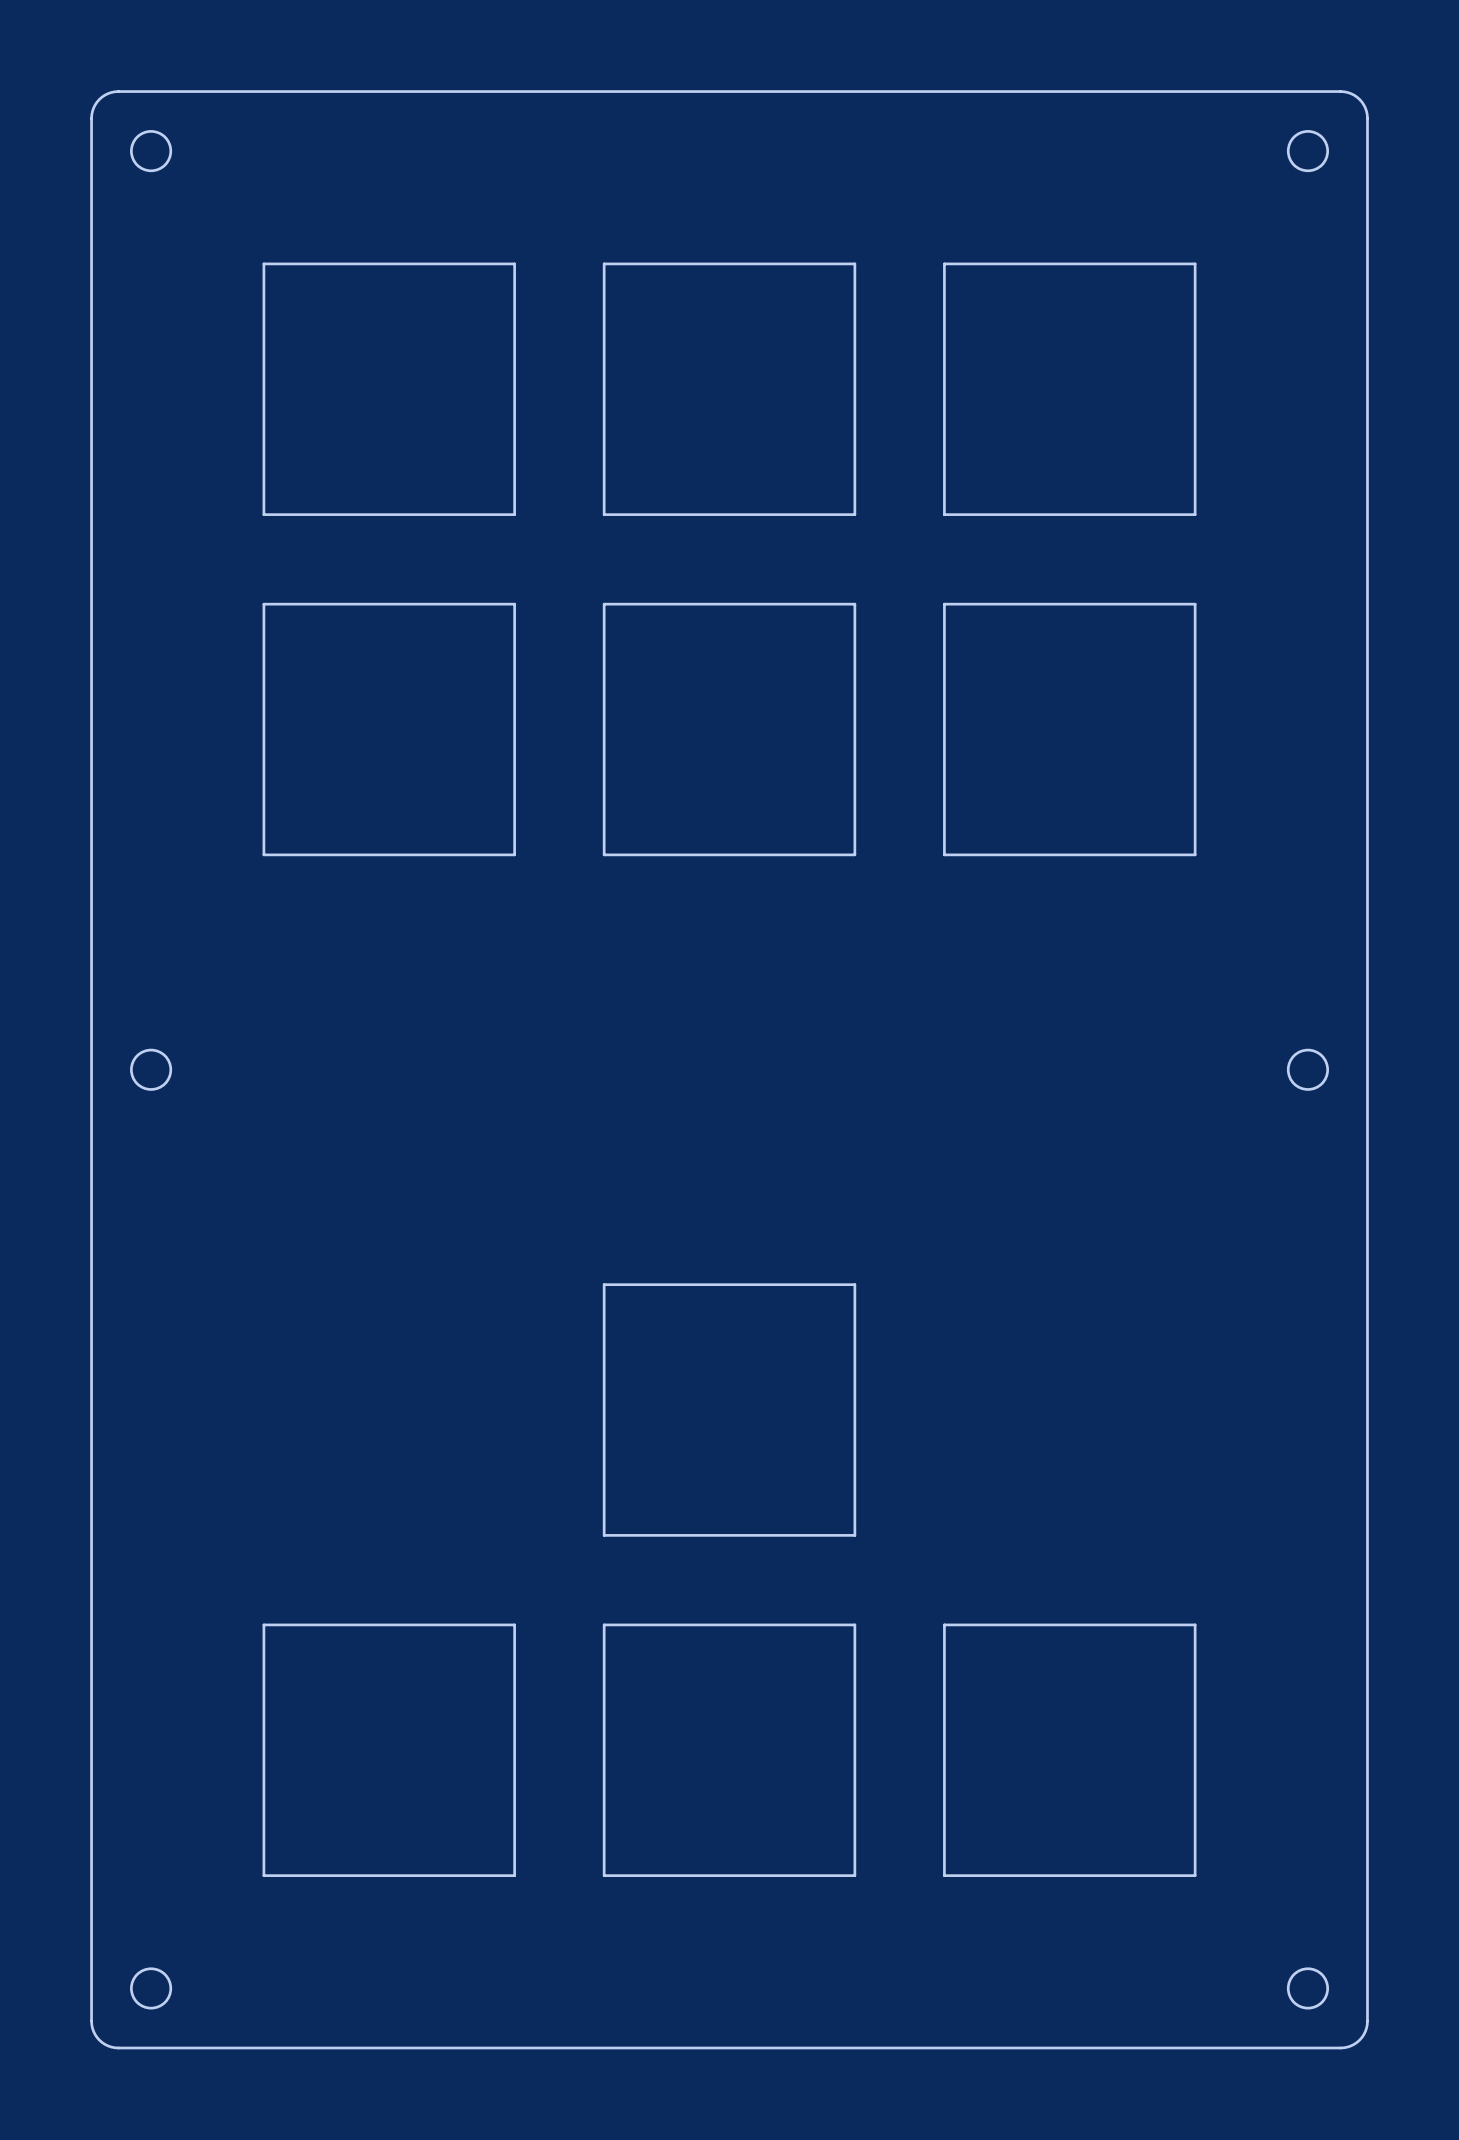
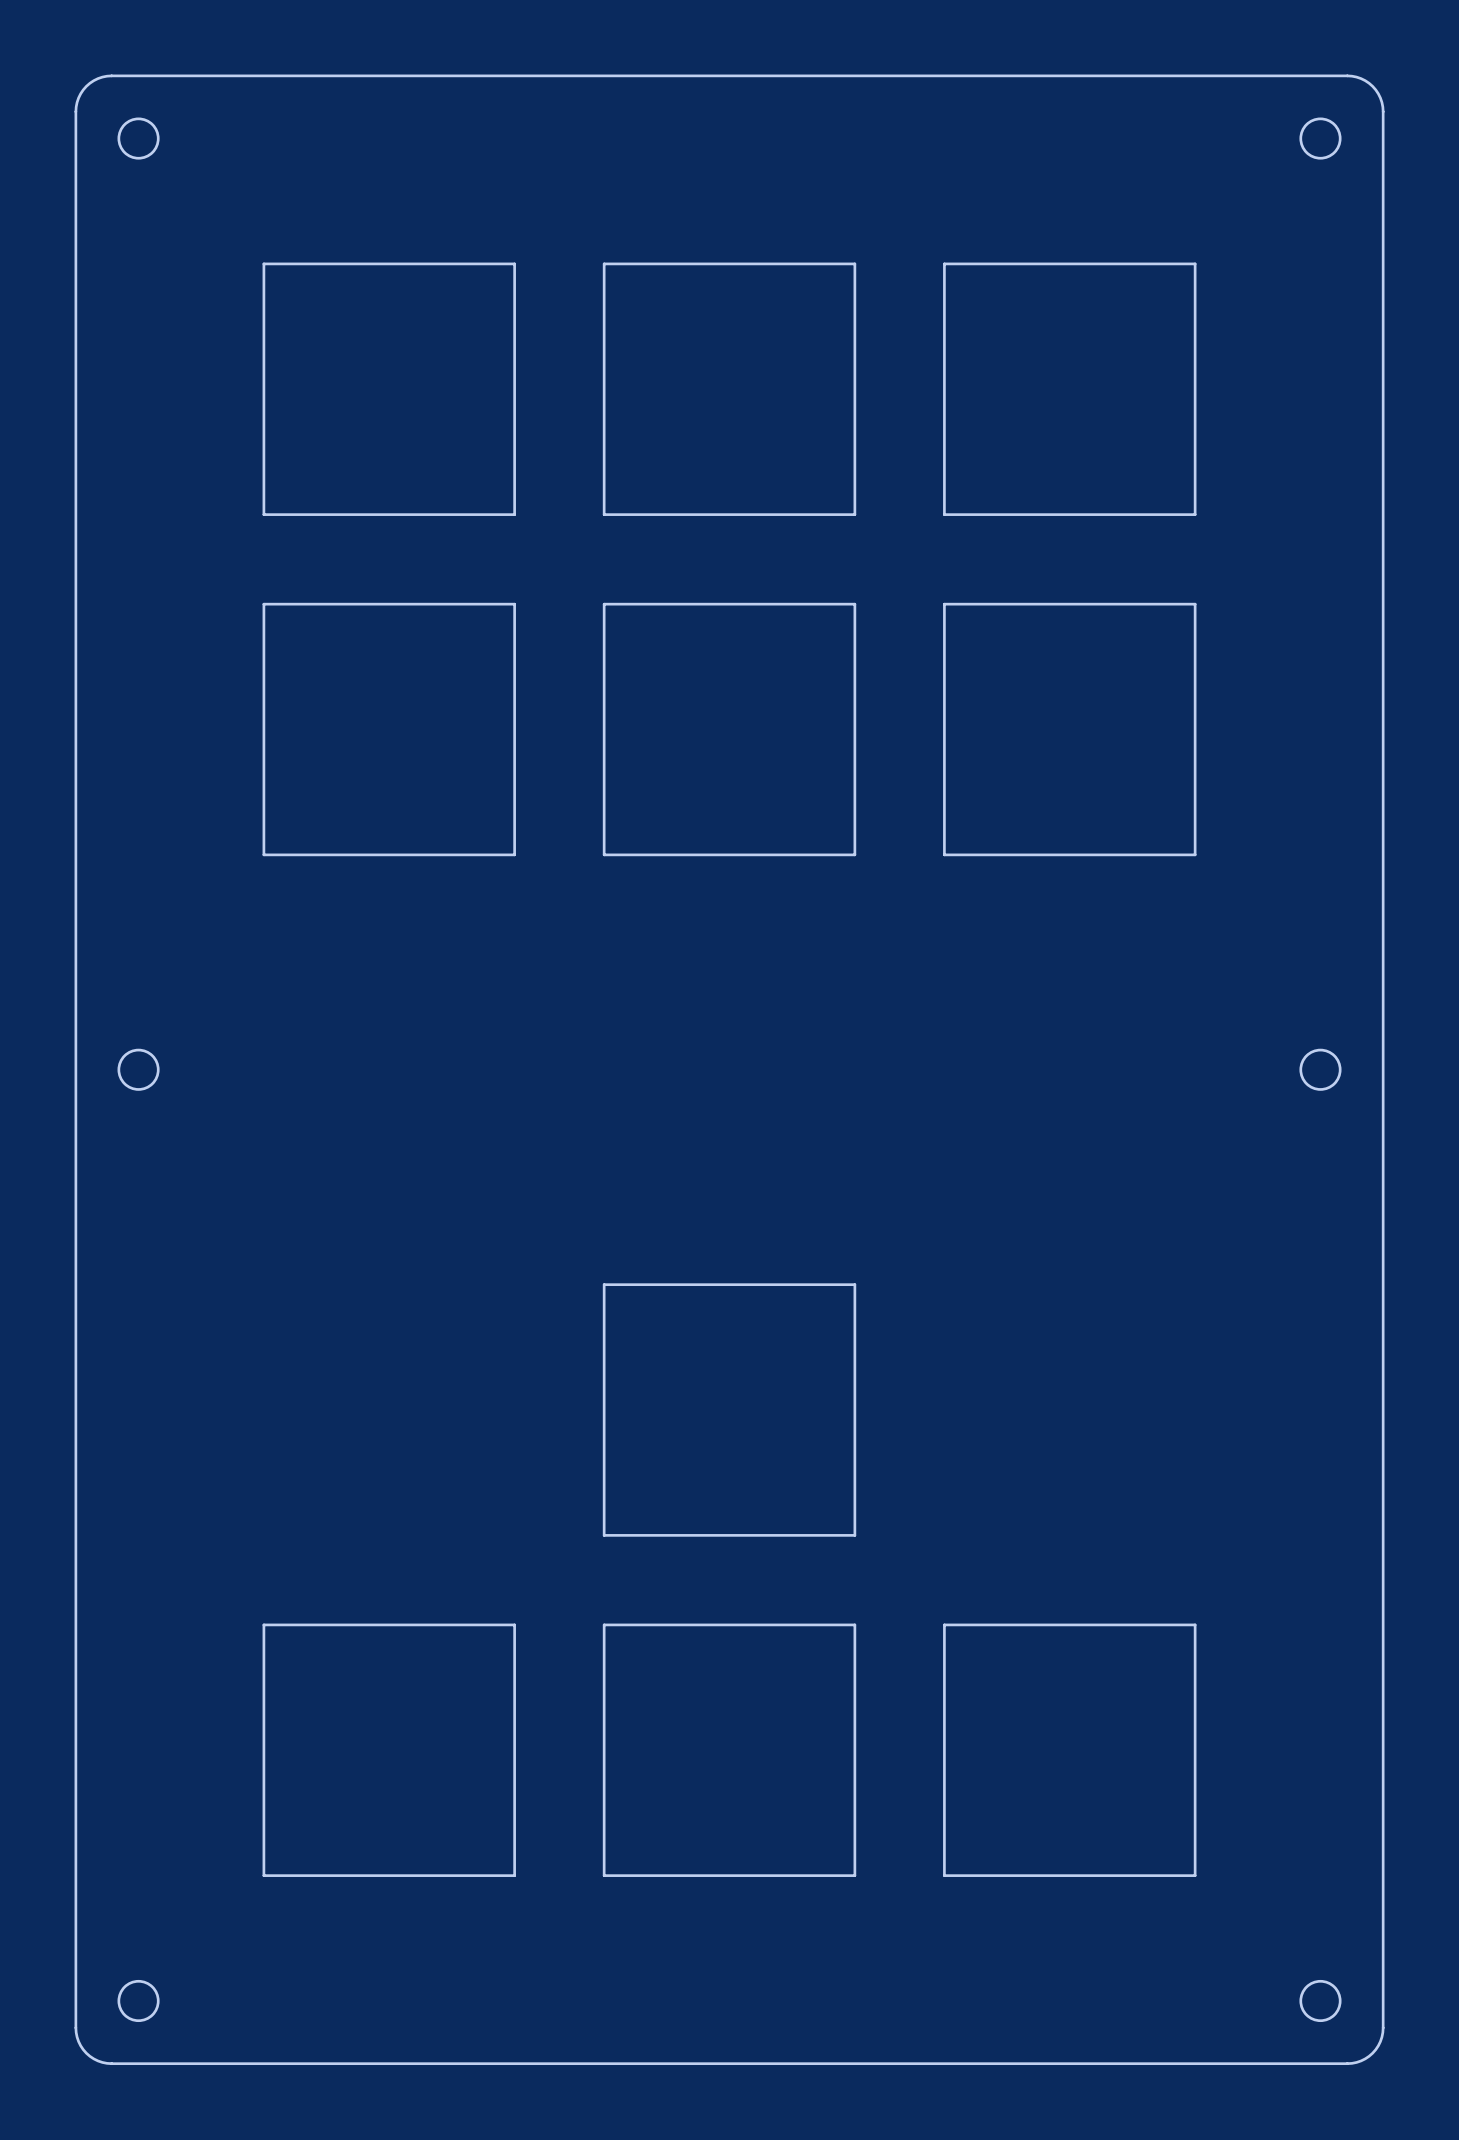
board edge: (1340, 91) (118, 91) (104, 95) (95, 104) (91, 118) (91, 2021) (95, 2034) (104, 2044) (118, 2047) (1340, 2047) (1354, 2044) (1363, 2034) (1367, 2021) (1367, 118) (1365, 108) (1359, 99) (1350, 93) (1340, 91) -> (1347, 75) (1361, 78) (1372, 86) (1380, 97) (1383, 111) (1383, 2027) (1378, 2045) (1365, 2058) (1347, 2063) (111, 2063) (93, 2058) (80, 2045) (75, 2027) (75, 111) (80, 93) (93, 80) (111, 75) (1347, 75)
round board edge position: (151, 151) -> (138, 138)
round board edge position: (1307, 151) -> (1320, 138)
round board edge position: (151, 1069) -> (138, 1069)
round board edge position: (1307, 1069) -> (1320, 1069)
round board edge position: (151, 1988) -> (138, 2000)
round board edge position: (1307, 1988) -> (1320, 2000)

